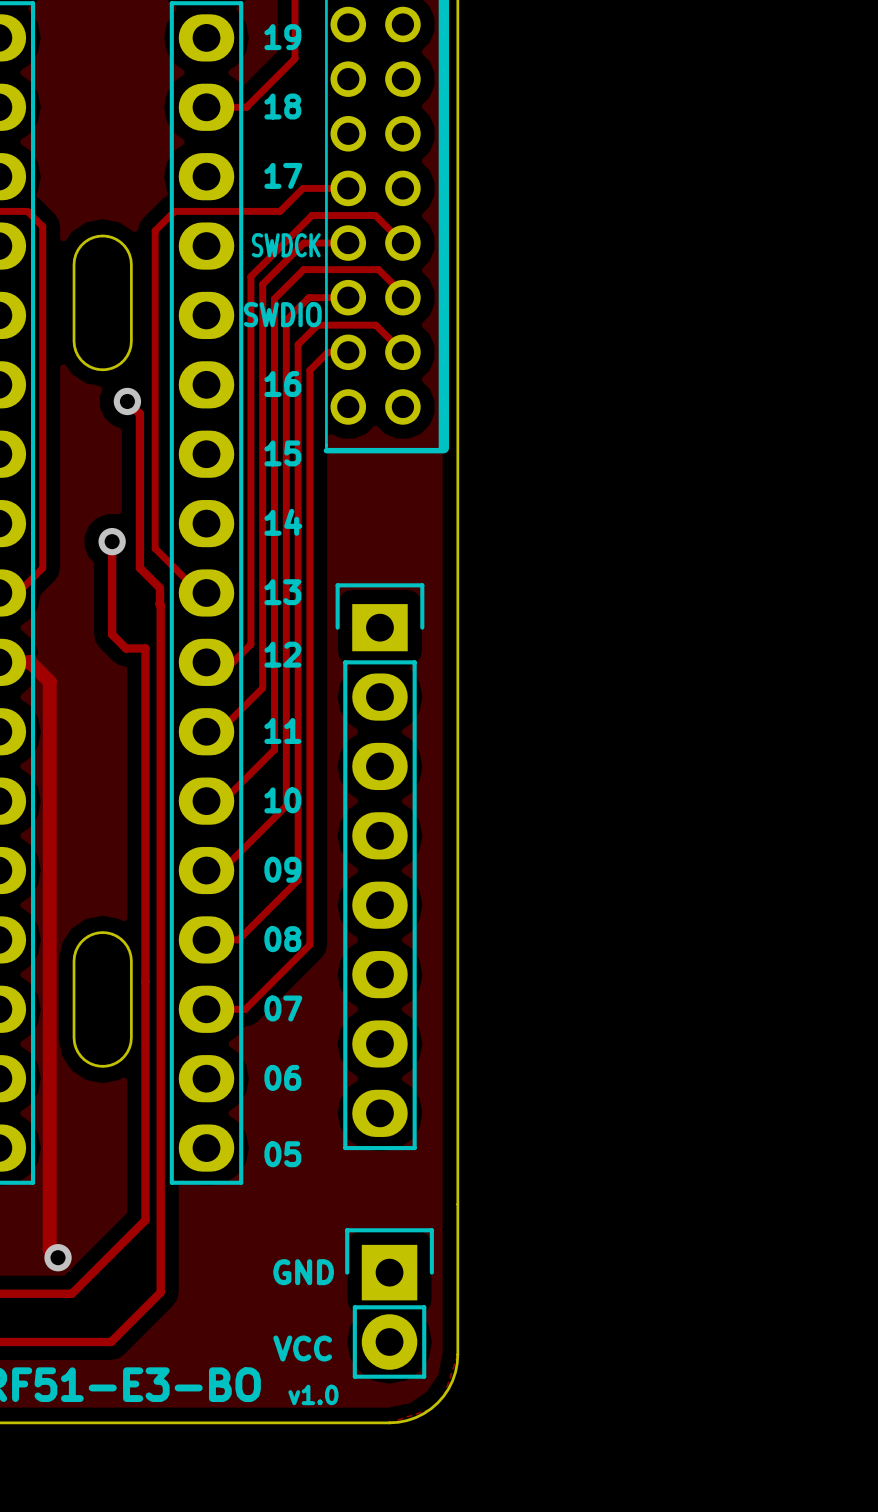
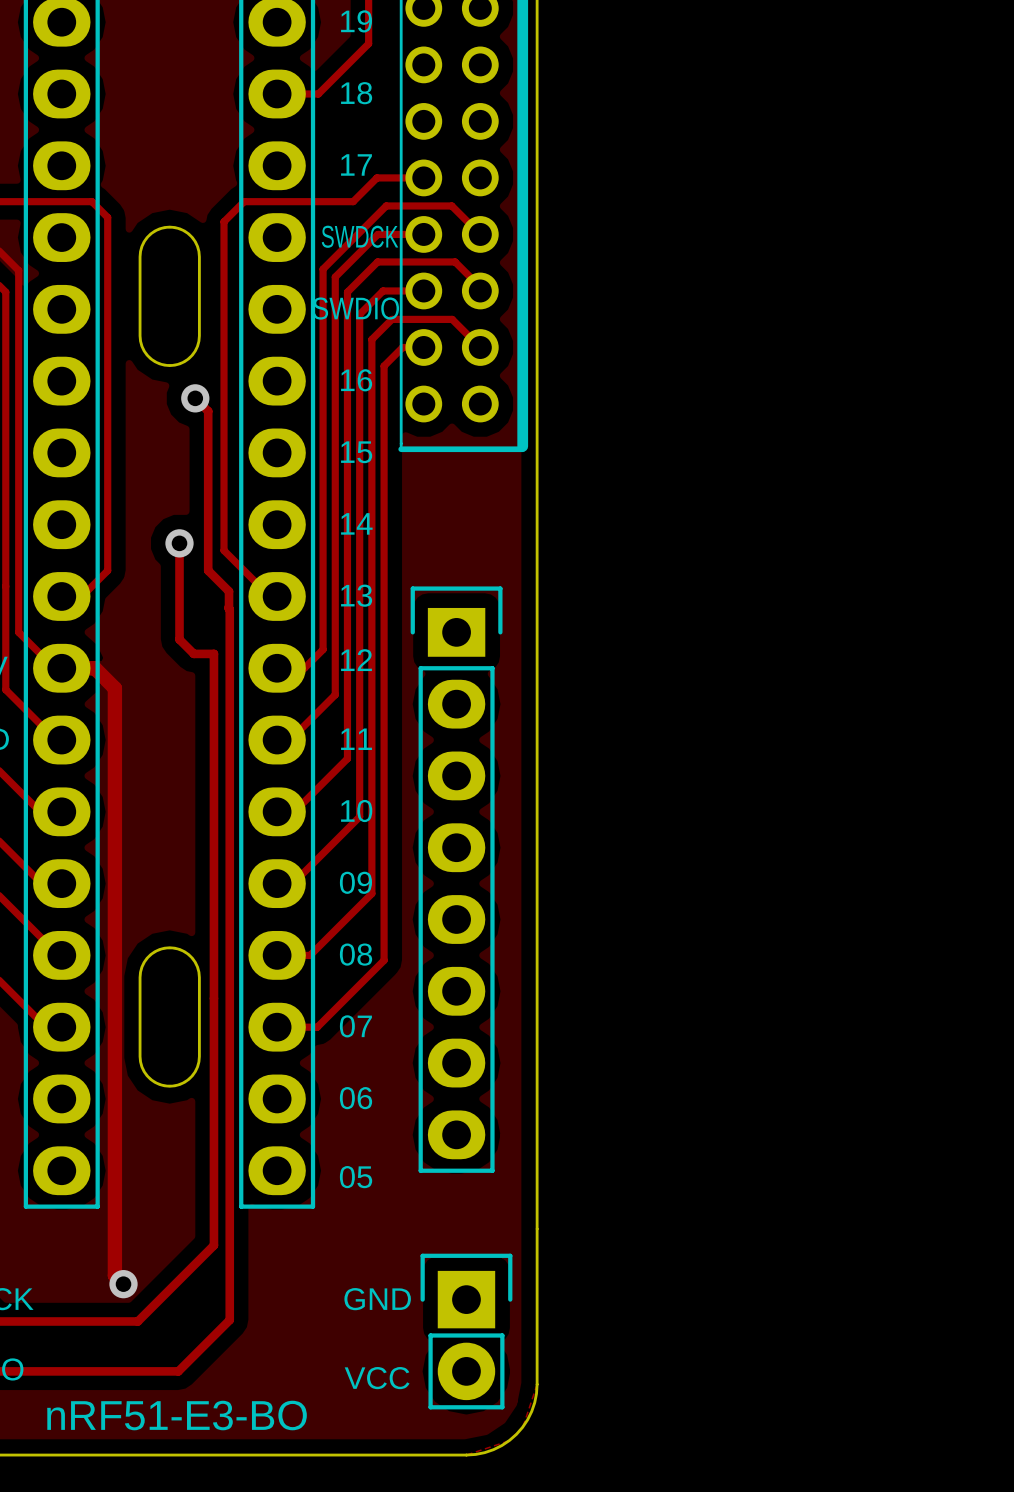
text: v1.0 (313, 1394) -> none

